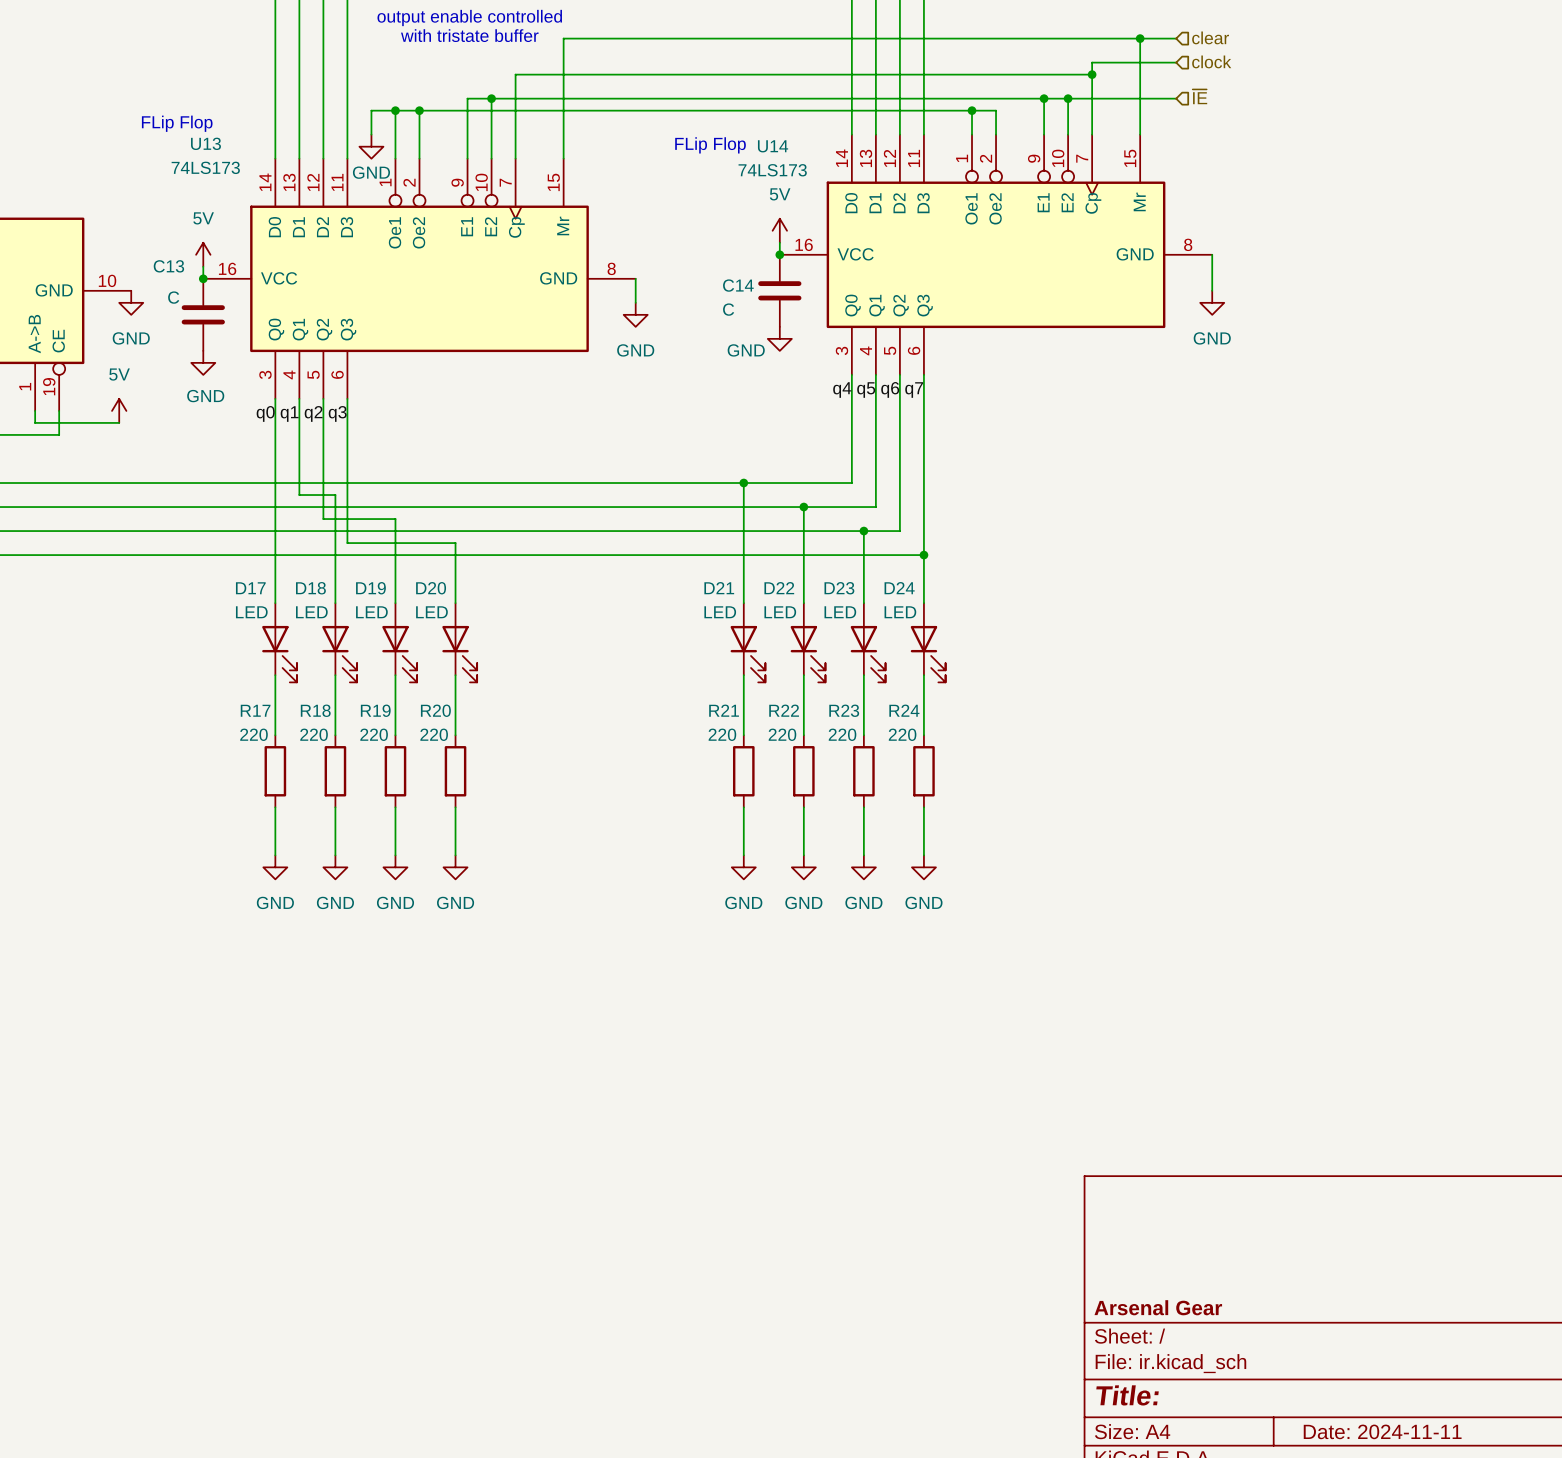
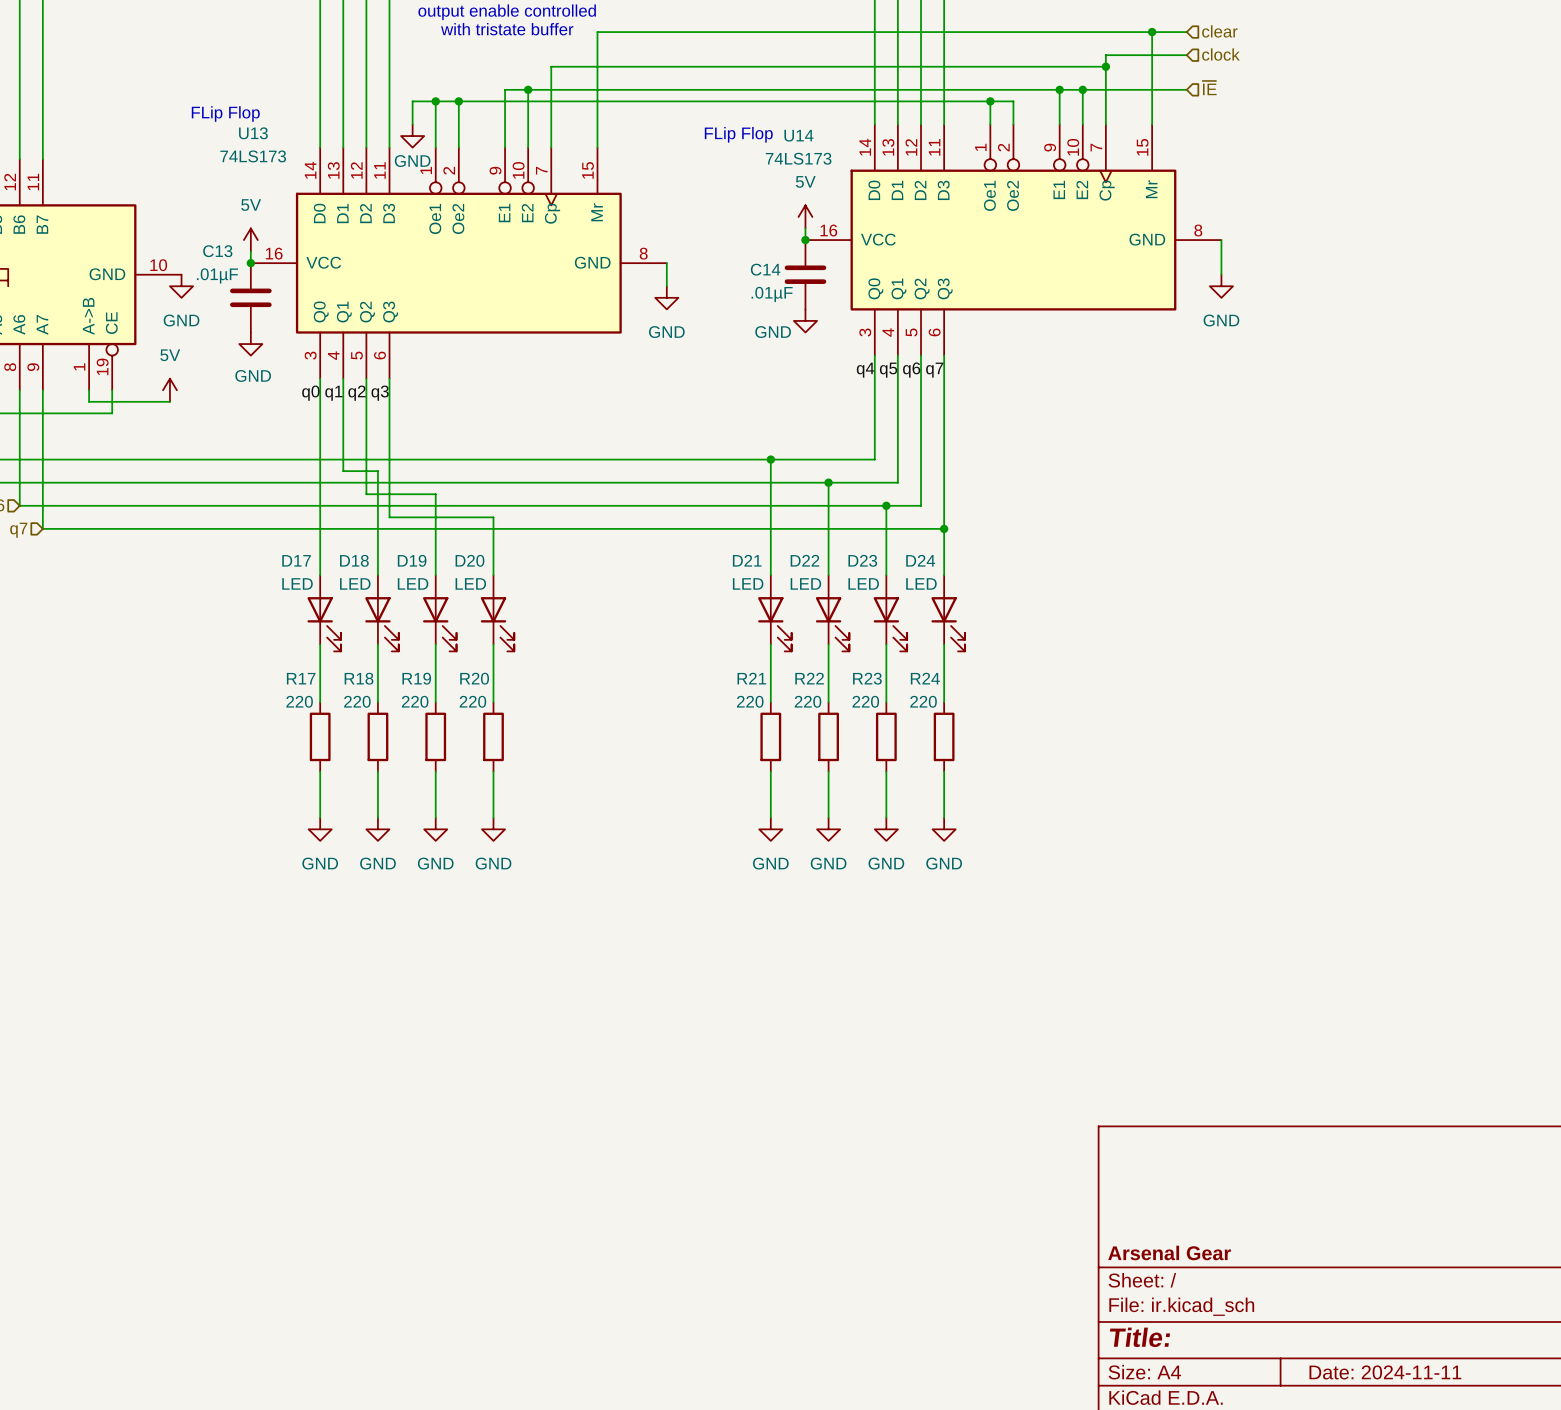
C13 value: C (173, 297) -> .01µF (217, 275)
C14 value: C (728, 309) -> .01µF (772, 294)

